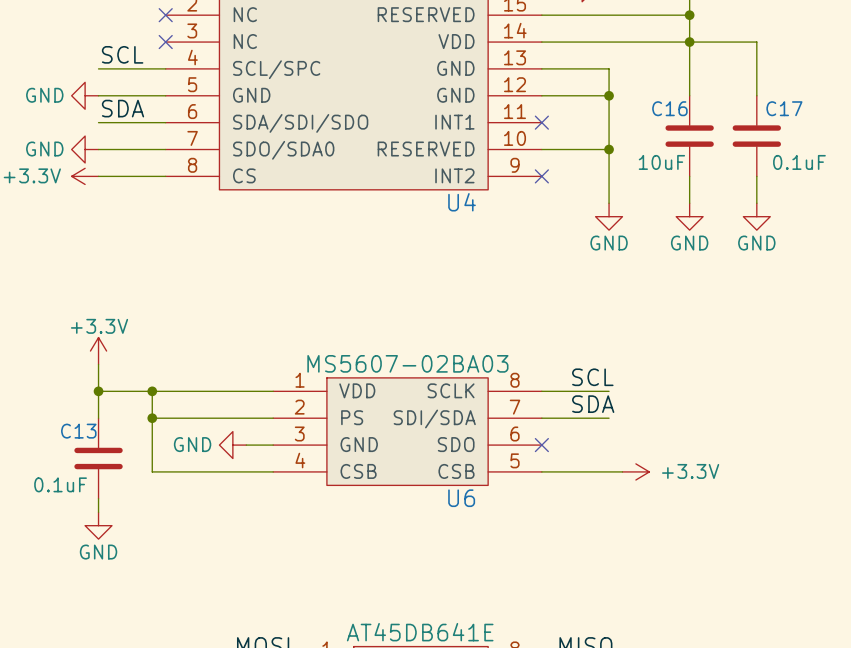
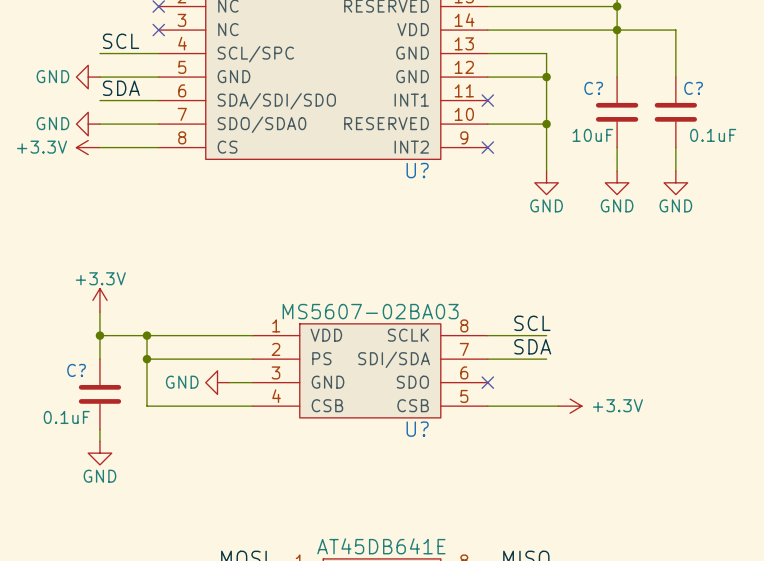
C16 name: C16 (669, 108) -> C? (593, 88)
C17 name: C17 (784, 108) -> C? (693, 88)
U4 name: U4 (462, 202) -> U? (417, 170)
C13 name: C13 (78, 431) -> C? (76, 370)
U6 name: U6 (461, 498) -> U? (417, 429)

